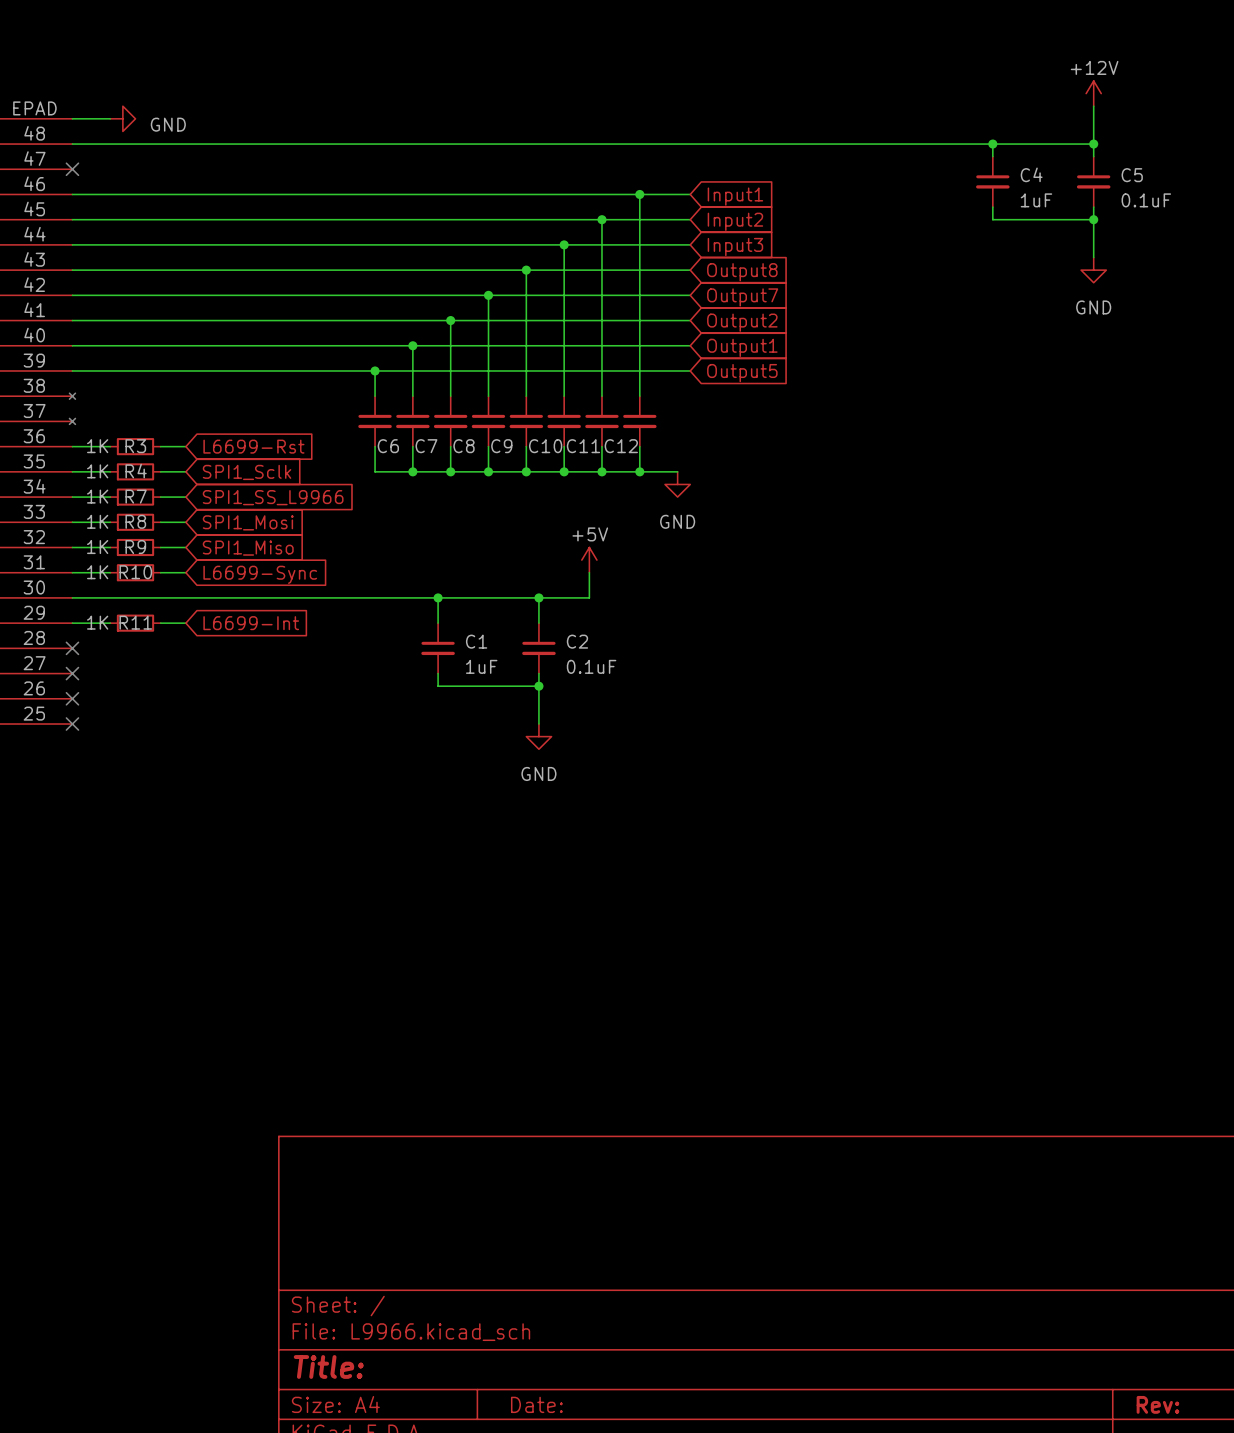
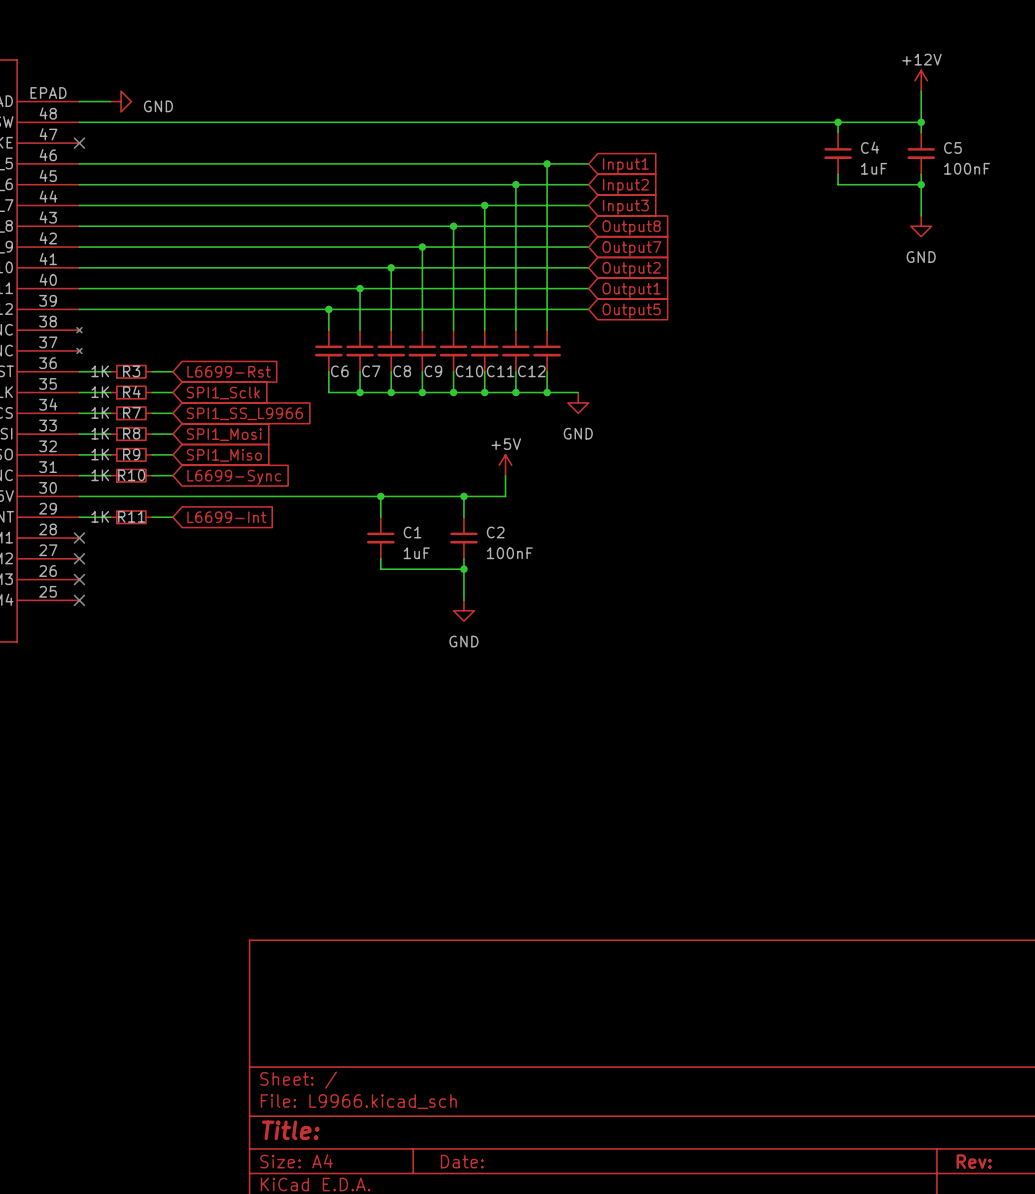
C5 value: 0.1uF (1146, 200) -> 100nF (967, 168)
C2 value: 0.1uF (591, 666) -> 100nF (509, 553)

